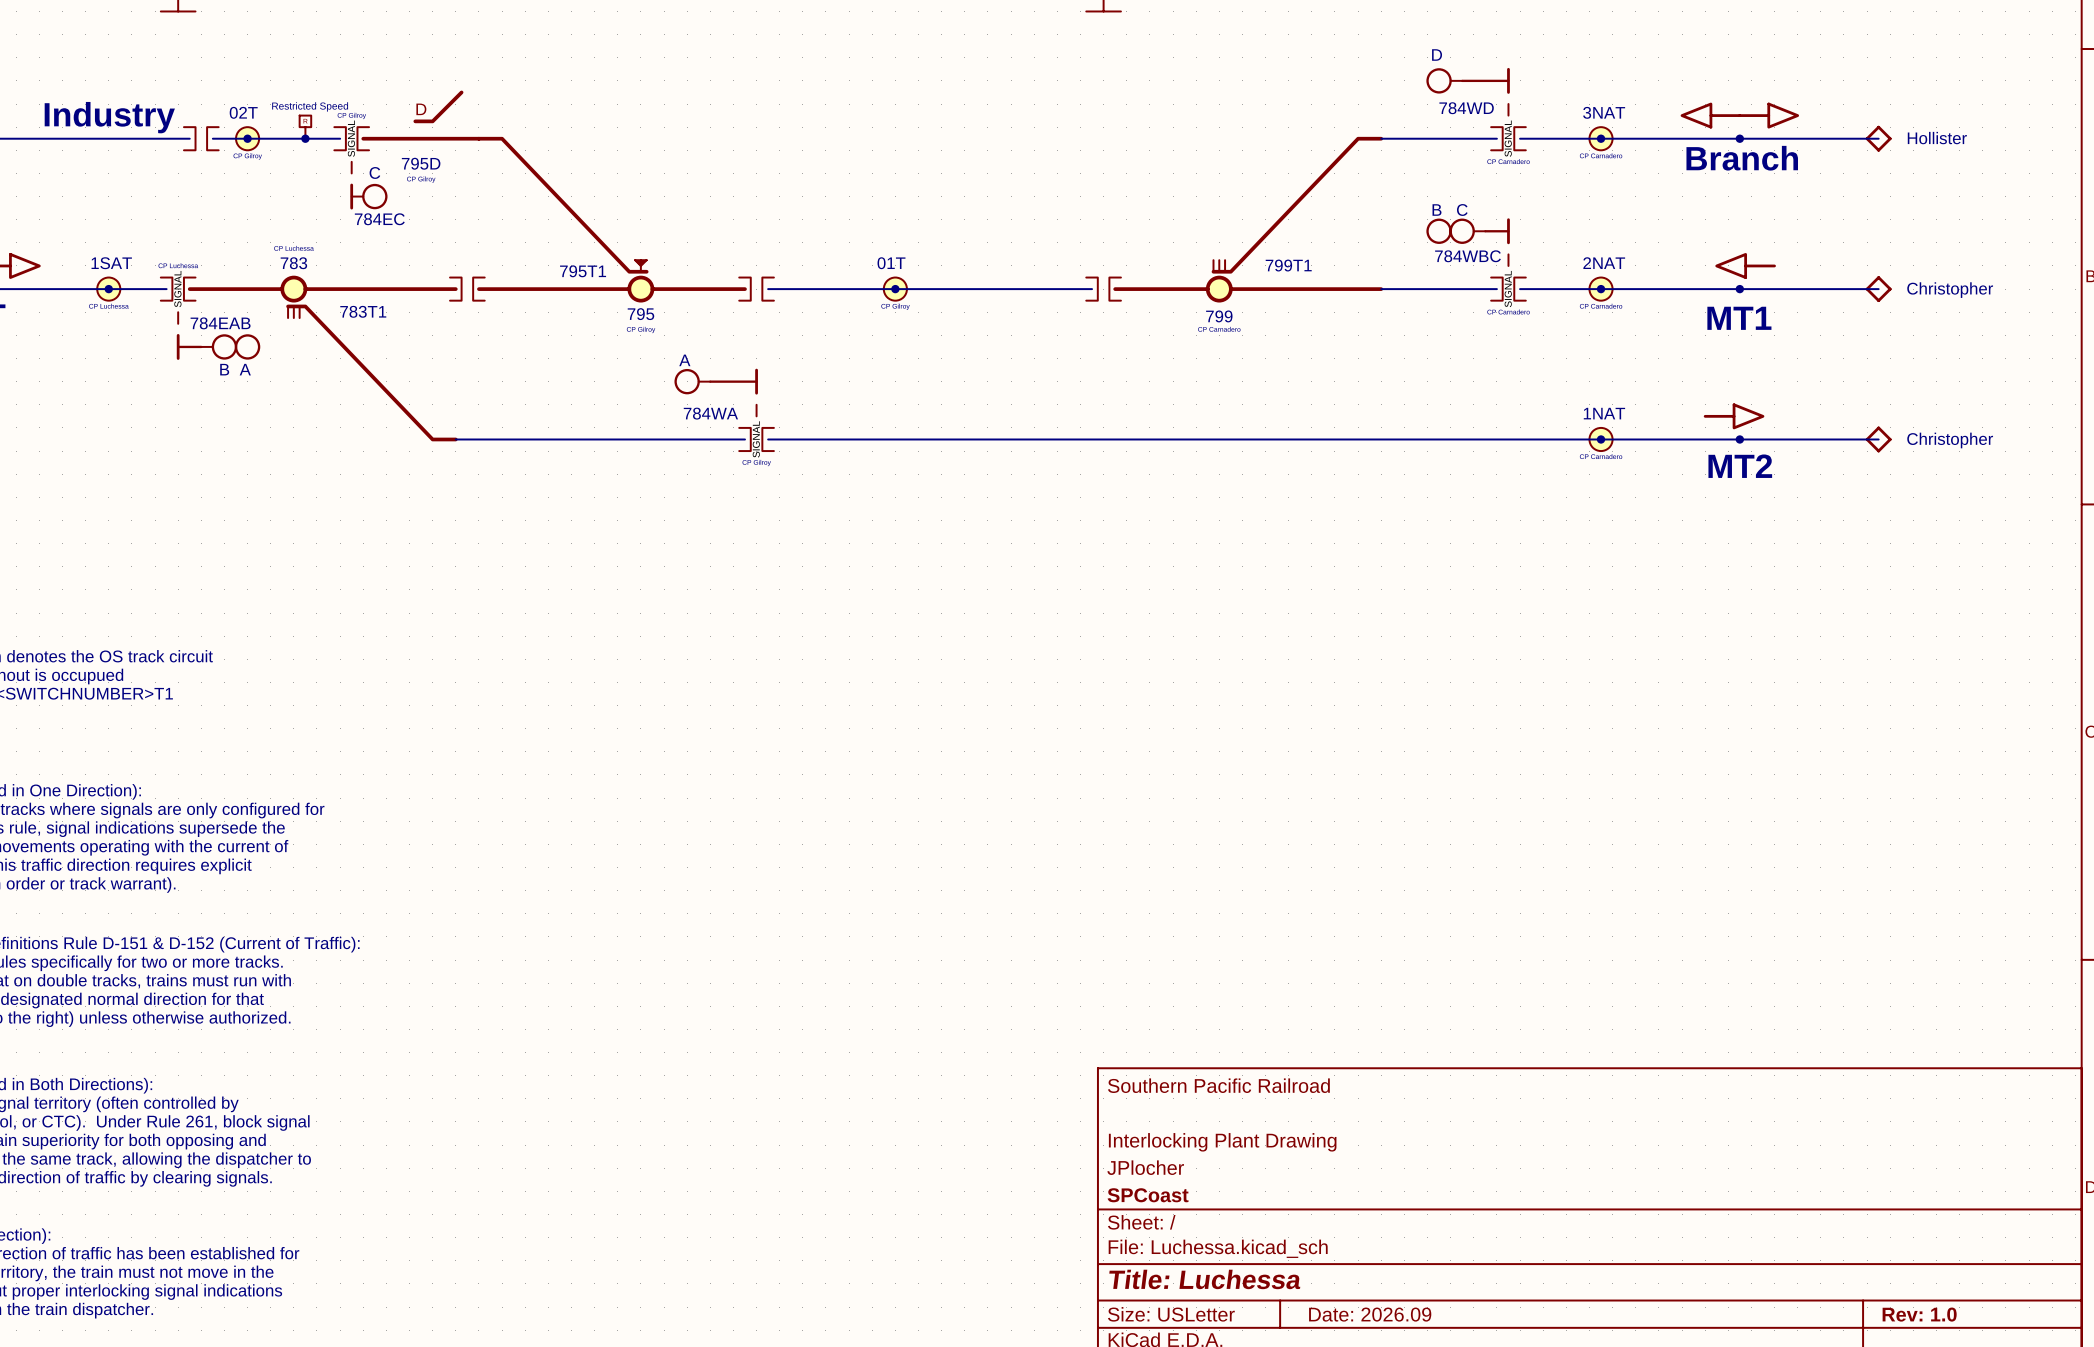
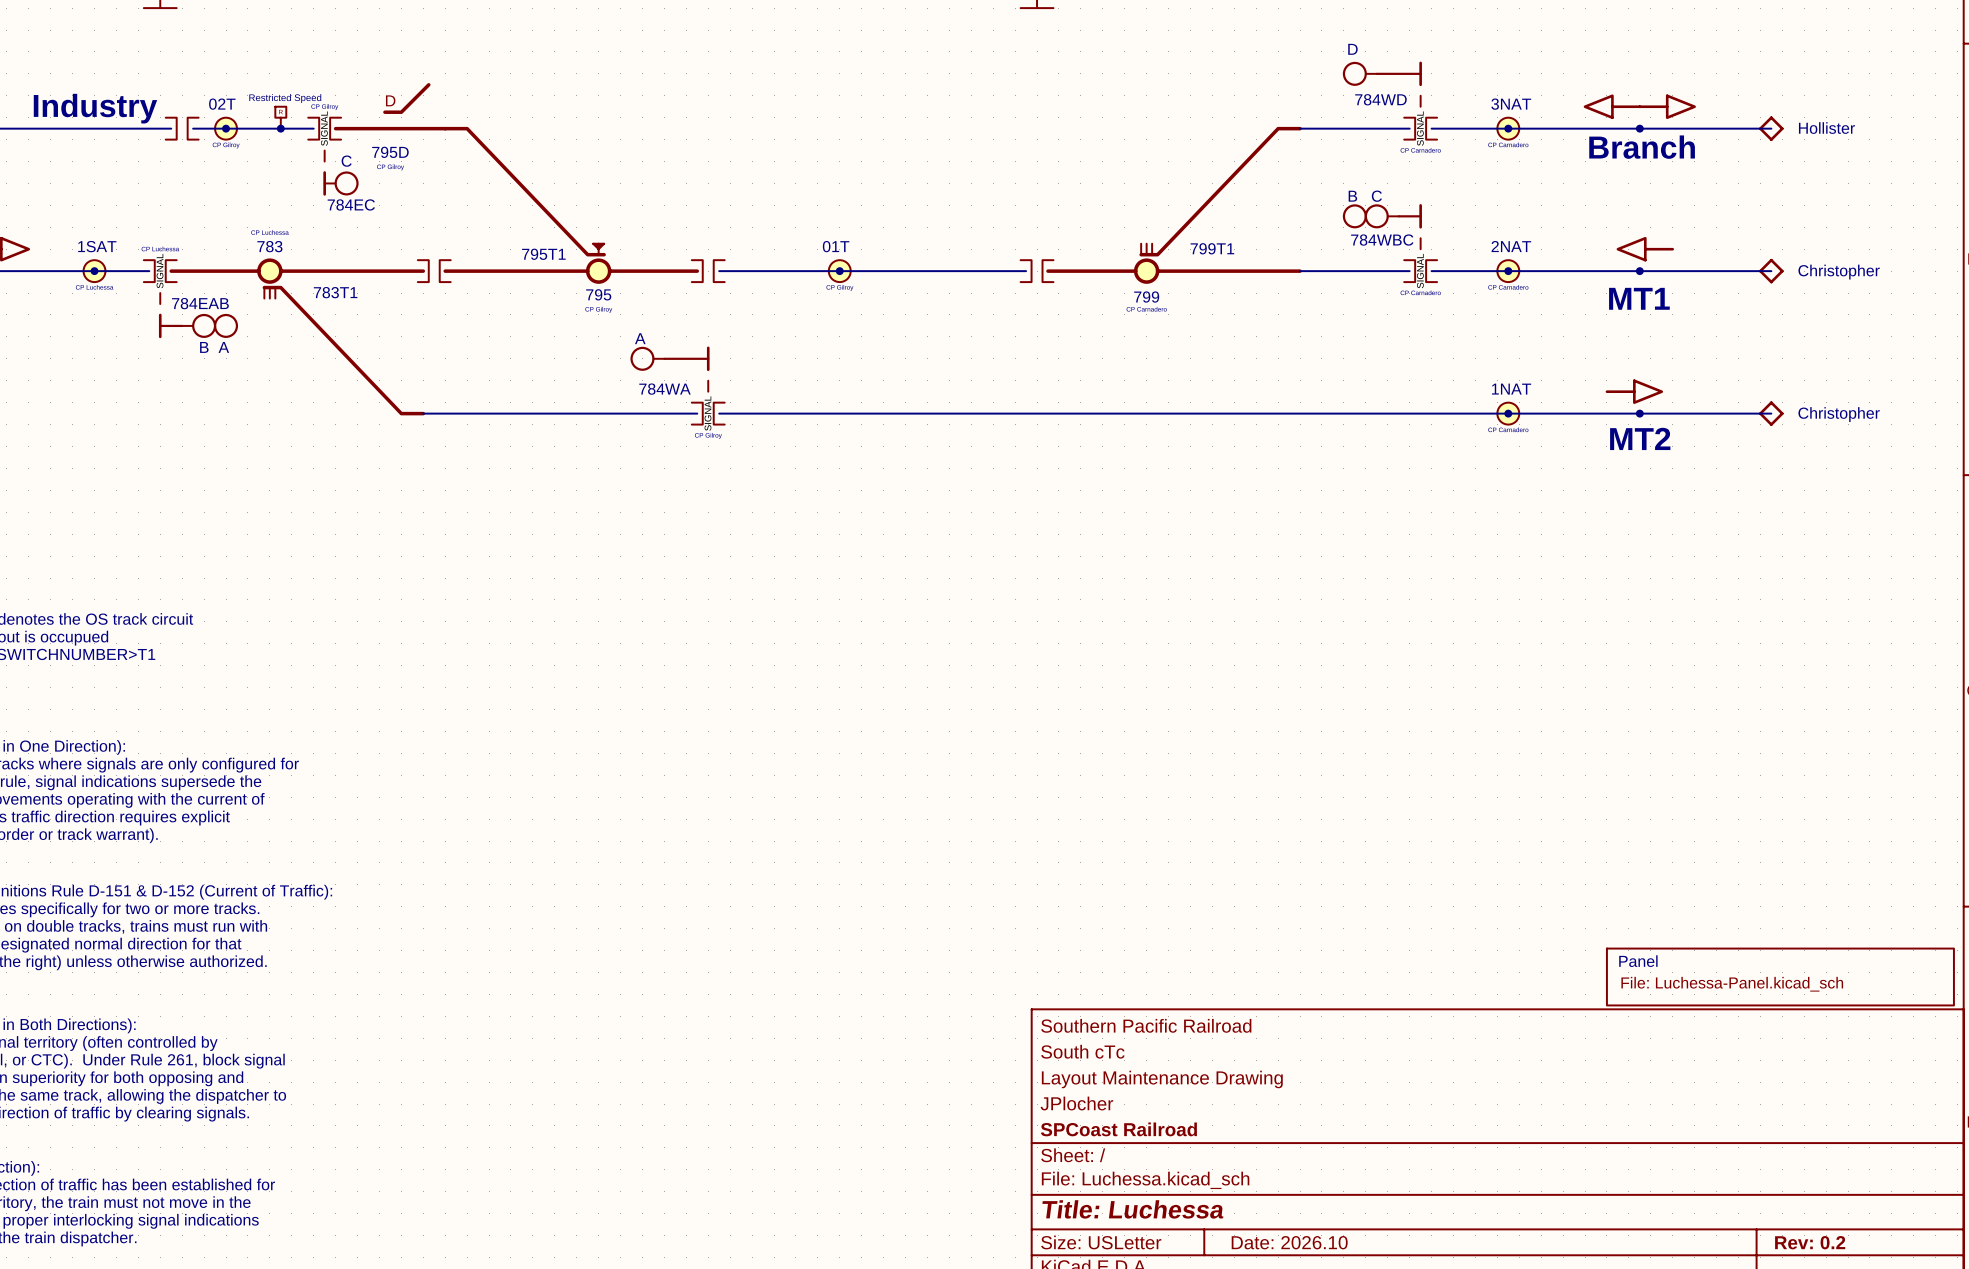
sheet Panel: none -> File: Luchessa-Panel.kicad_sch (1780, 977)
title block: none -> South cTc (1082, 1051)
title block: Interlocking Plant Drawing (1222, 1142) -> Layout Maintenance Drawing (1162, 1079)
title block: SPCoast (1148, 1195) -> SPCoast Railroad (1118, 1129)
title block: Date: 2026.09 (1370, 1314) -> Date: 2026.10 (1289, 1242)
title block: Rev: 1.0 (1919, 1314) -> Rev: 0.2 (1810, 1242)

